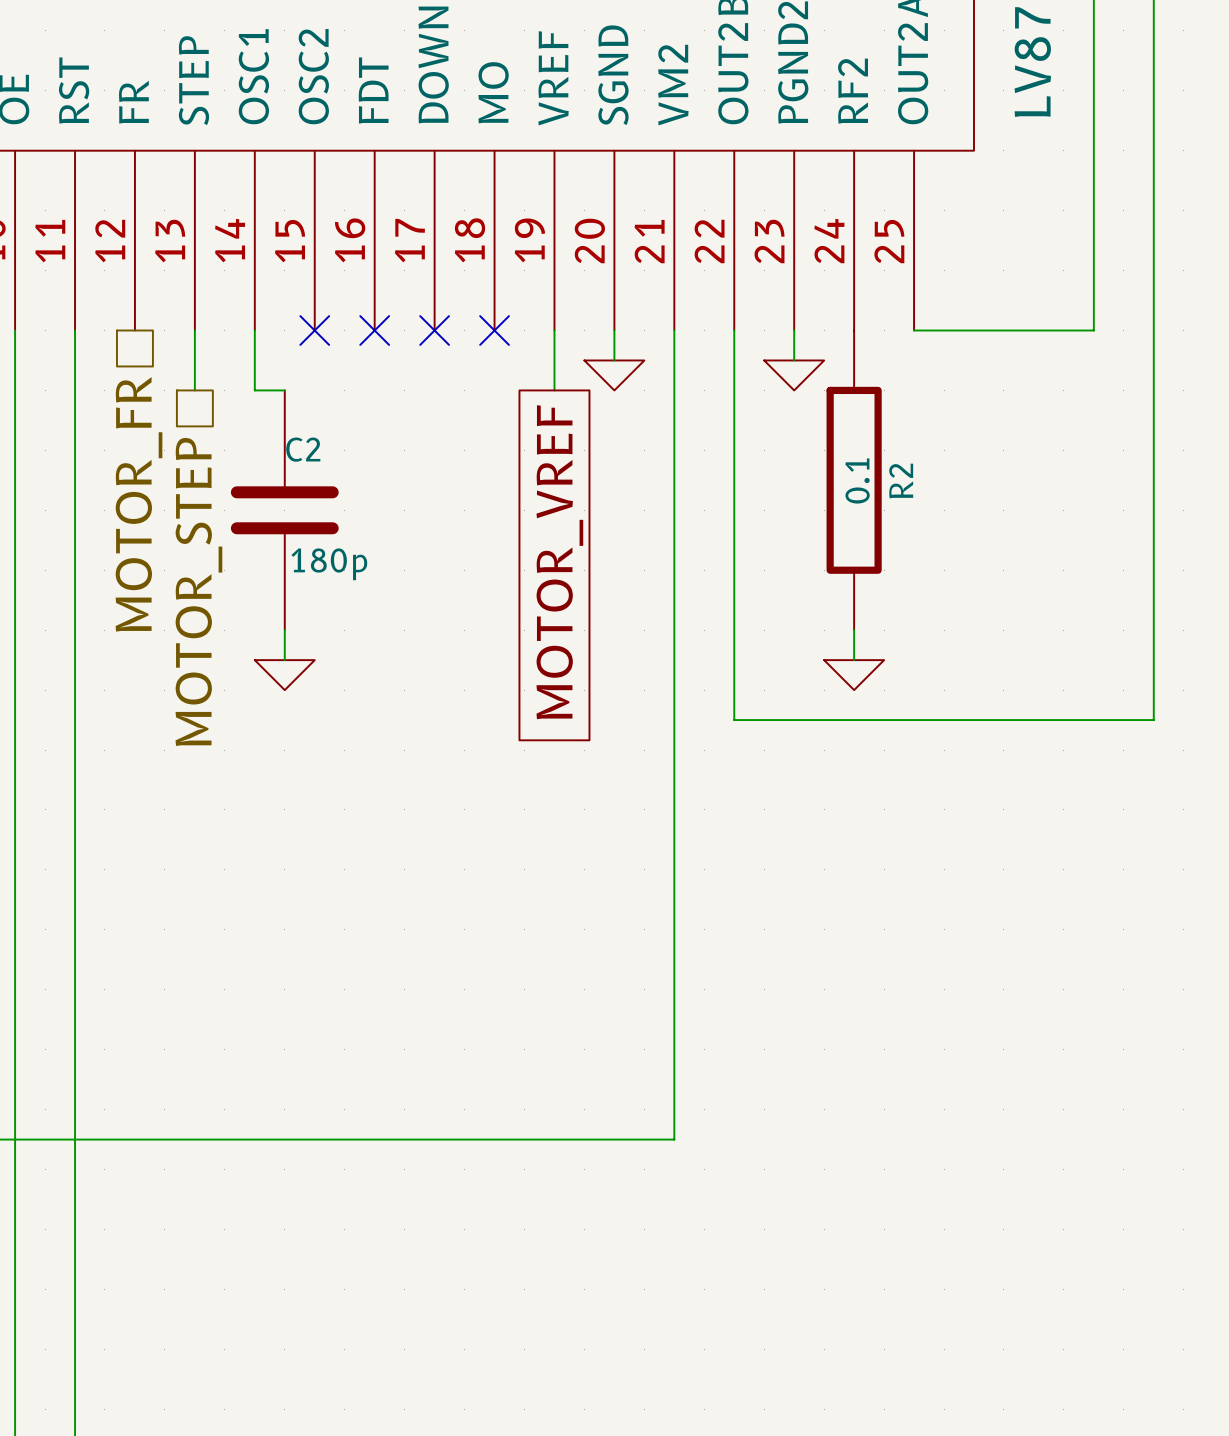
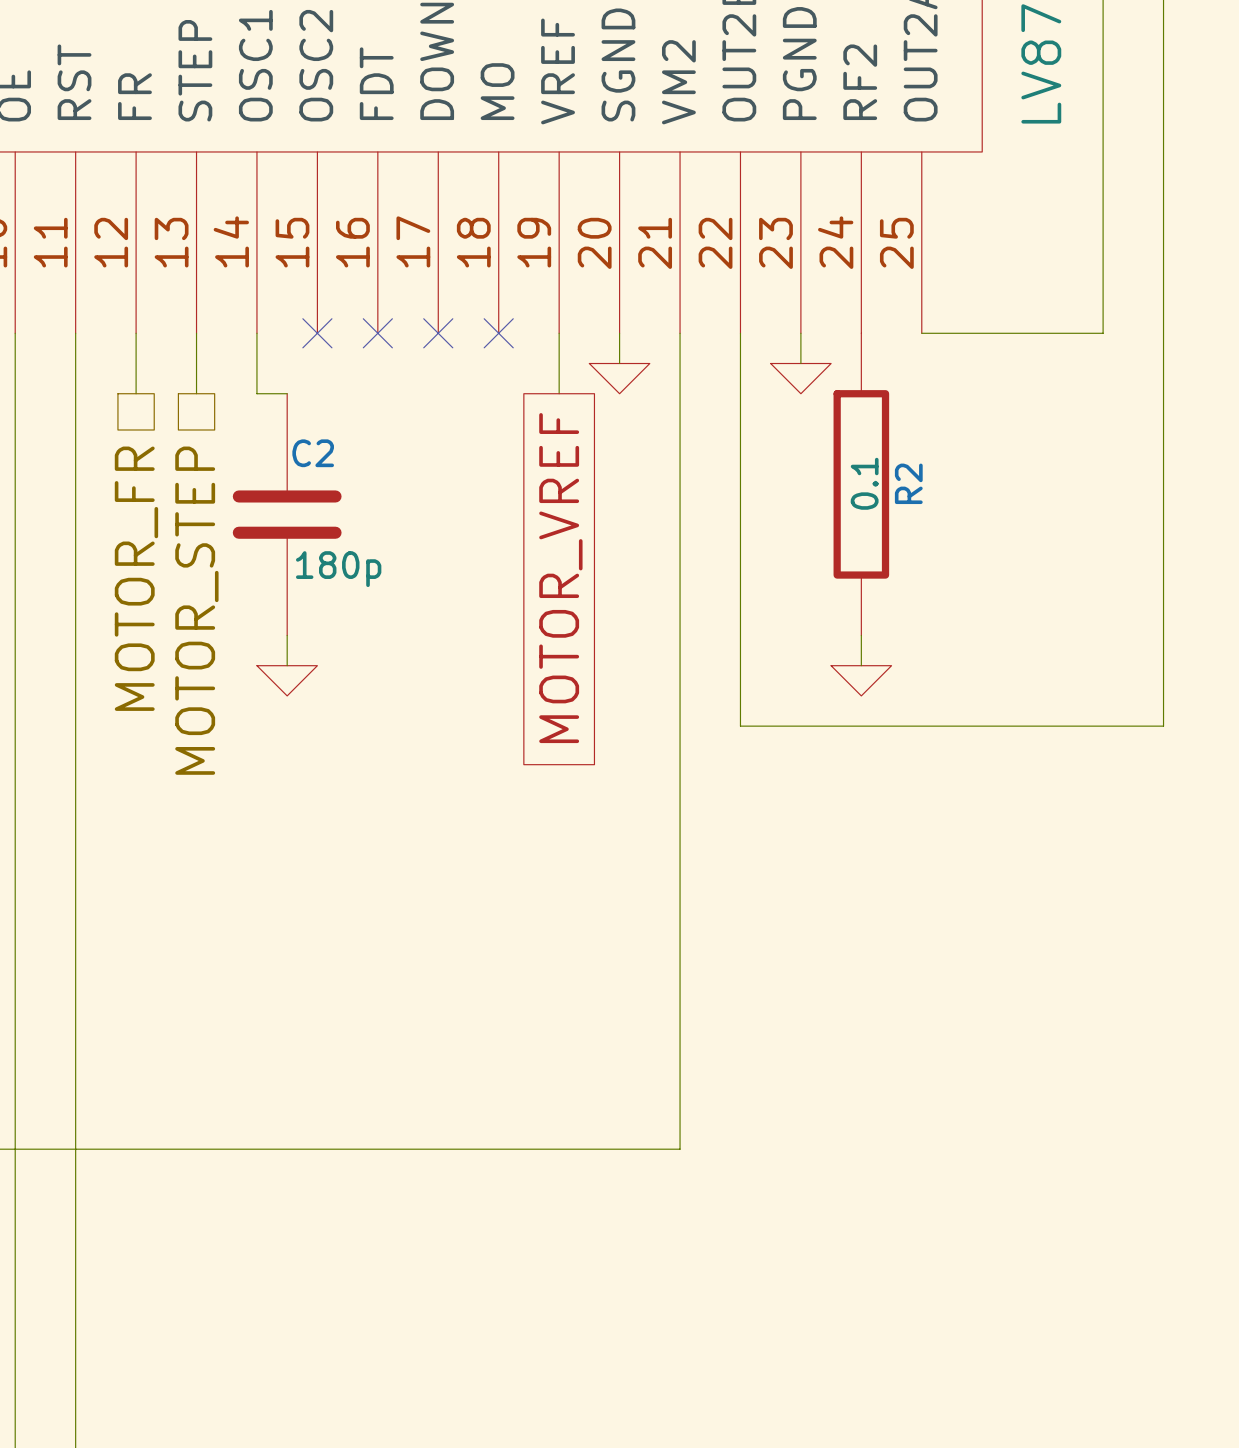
wire: none -> (136, 333) (136, 393)
hierarchical label position: MOTOR_FR (138, 504) -> MOTOR_FR (136, 578)

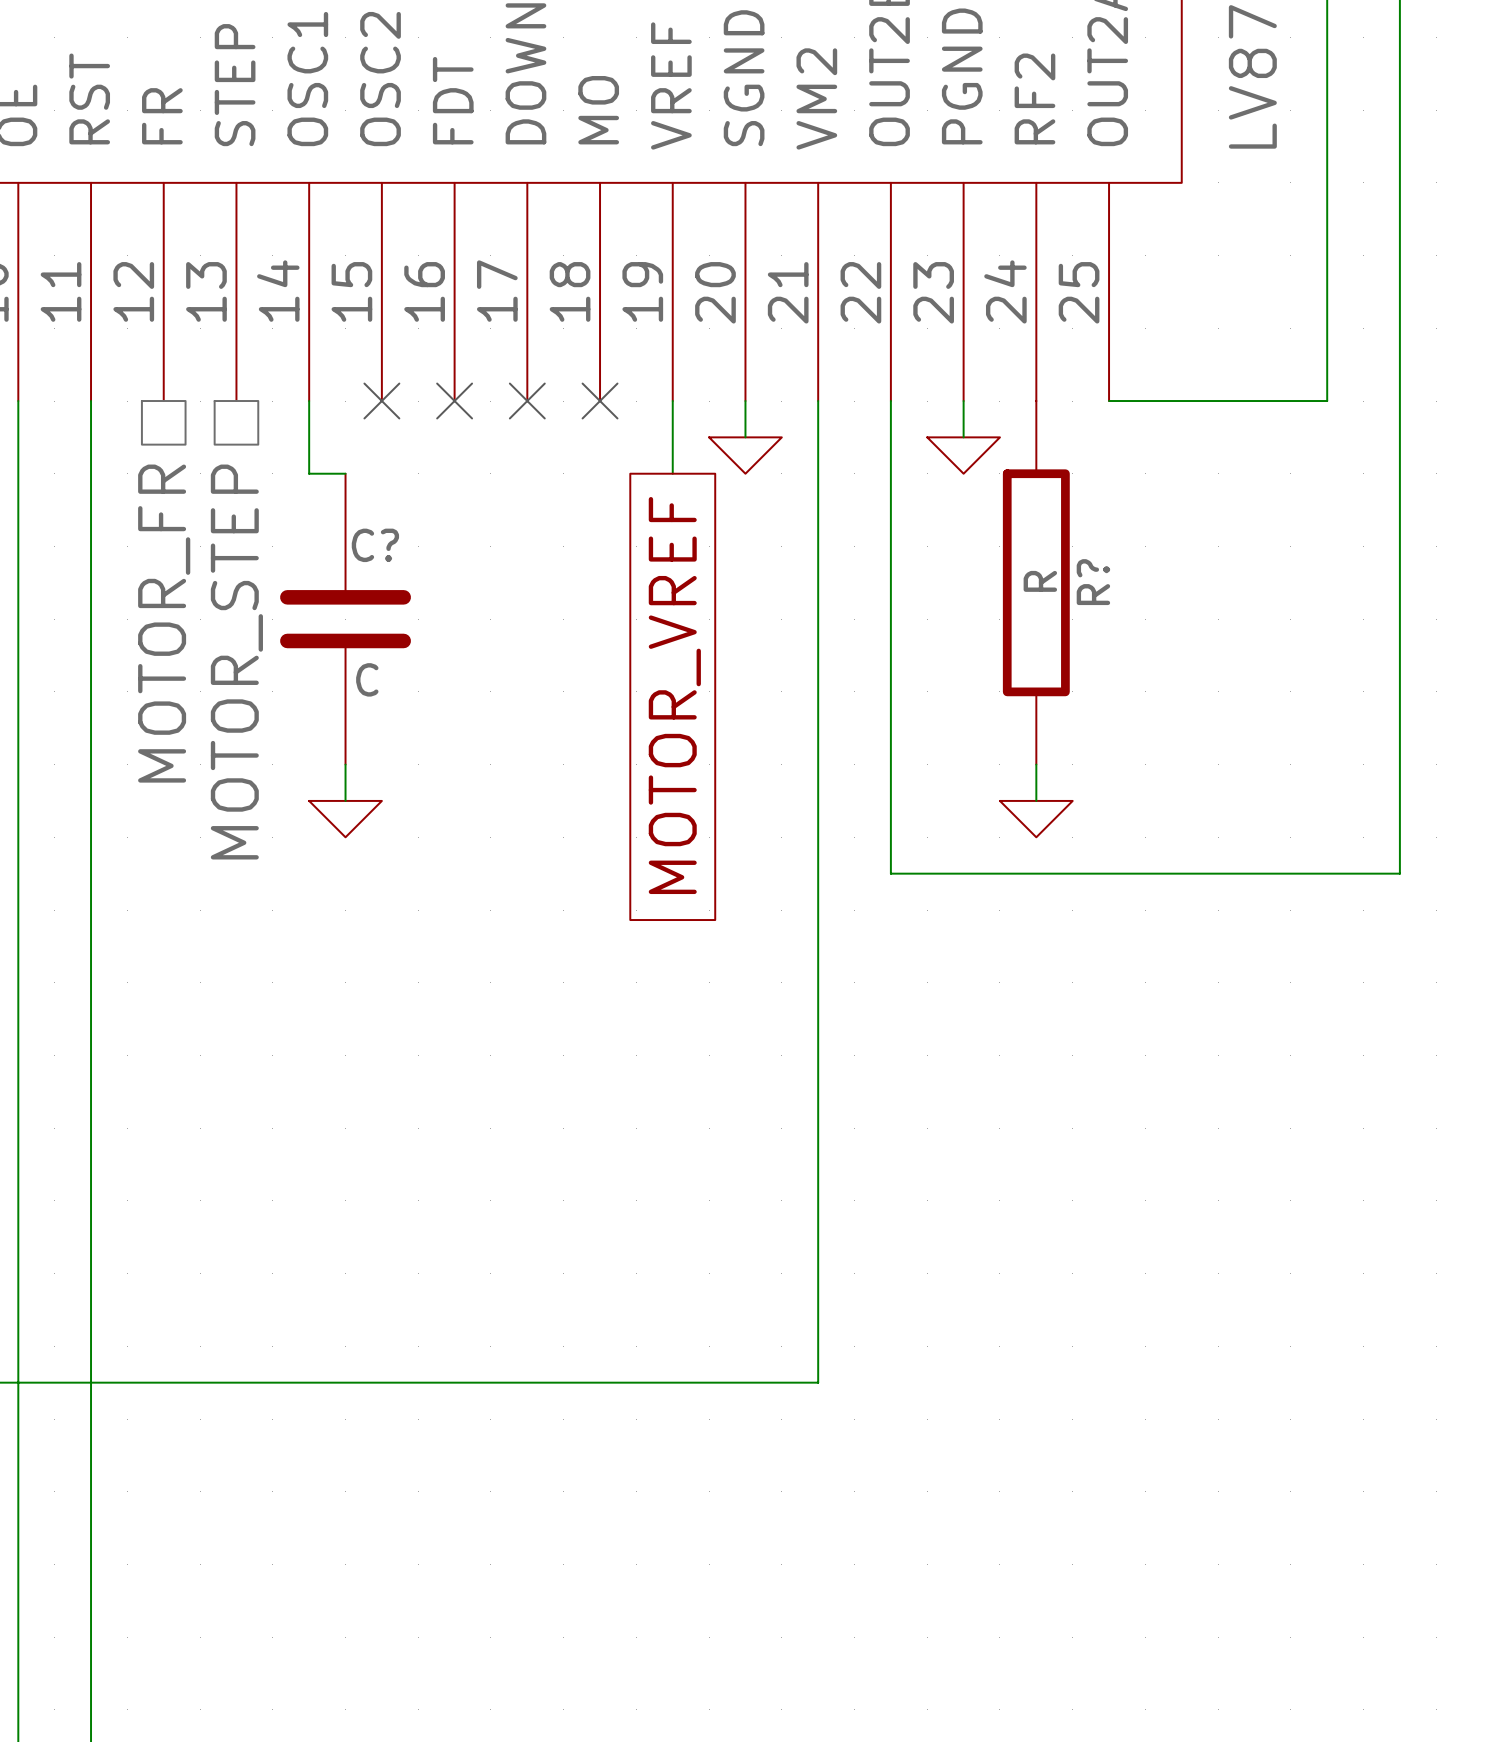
wire: (136, 333) (136, 393) -> none
wire: (196, 333) (196, 393) -> none
C2 name: C2 (313, 453) -> C? (375, 545)
R2 value: 0.1 (864, 483) -> R (1040, 581)
R2 name: R2 (908, 483) -> R? (1093, 582)
C2 value: 180p (338, 569) -> C (367, 679)
hierarchical label position: MOTOR_FR (136, 578) -> MOTOR_FR (164, 623)
hierarchical label position: MOTOR_STEP (196, 610) -> MOTOR_STEP (236, 662)

